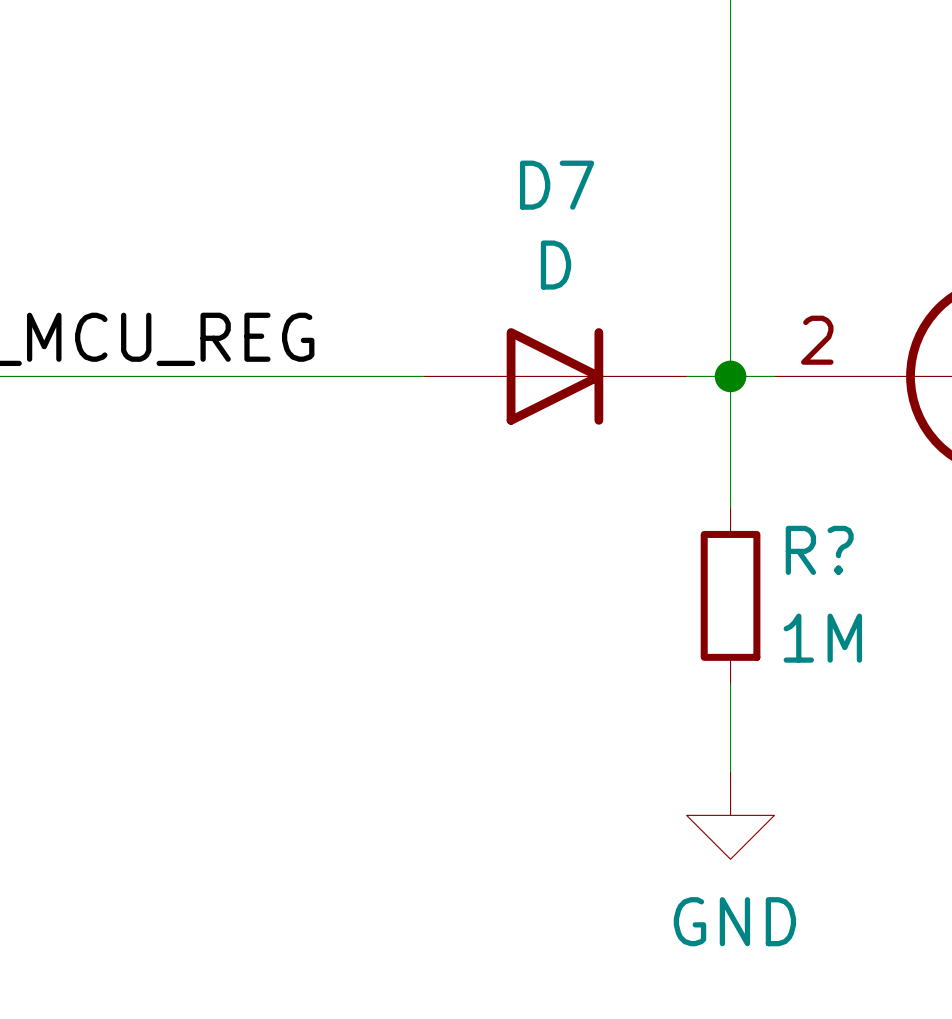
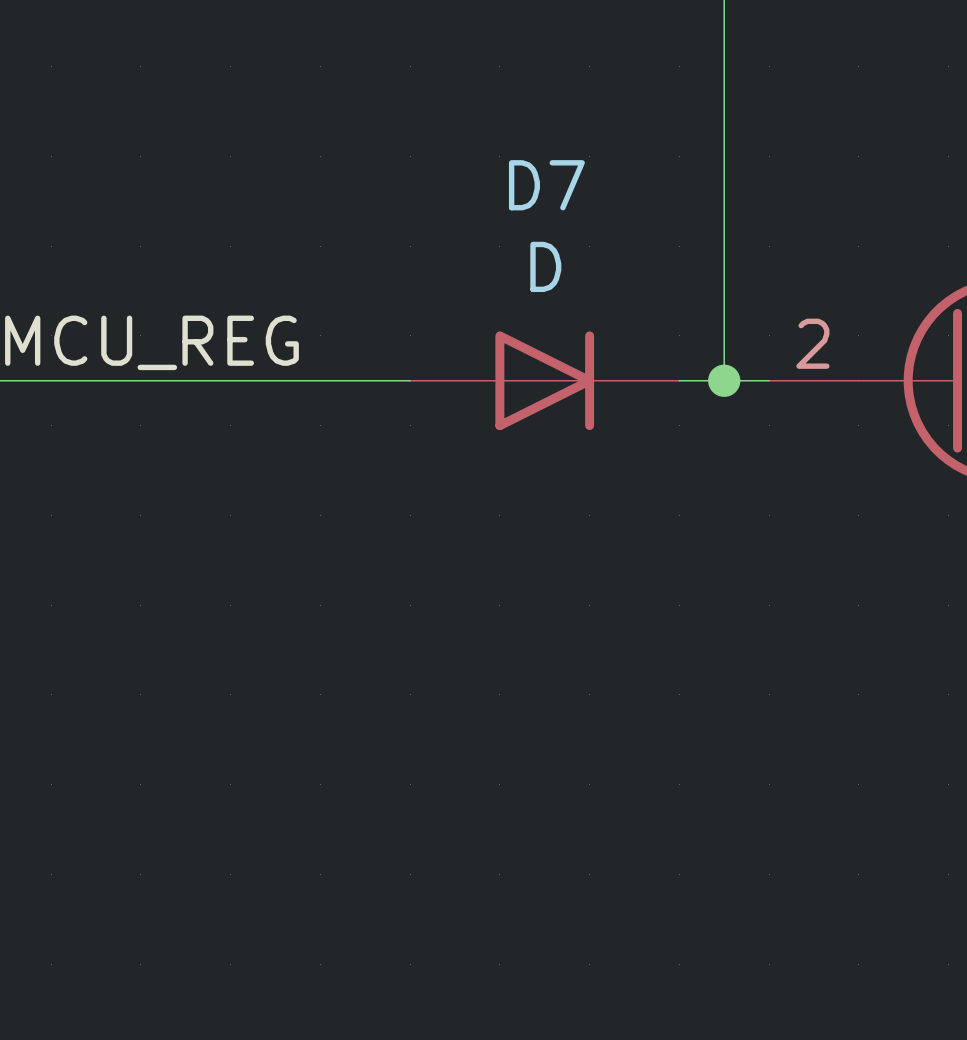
wire: (730, 376) (730, 508) -> none
R?: 1M (730, 595) -> none
wire: (730, 683) (730, 771) -> none
power symbol: GND (730, 815) -> none

